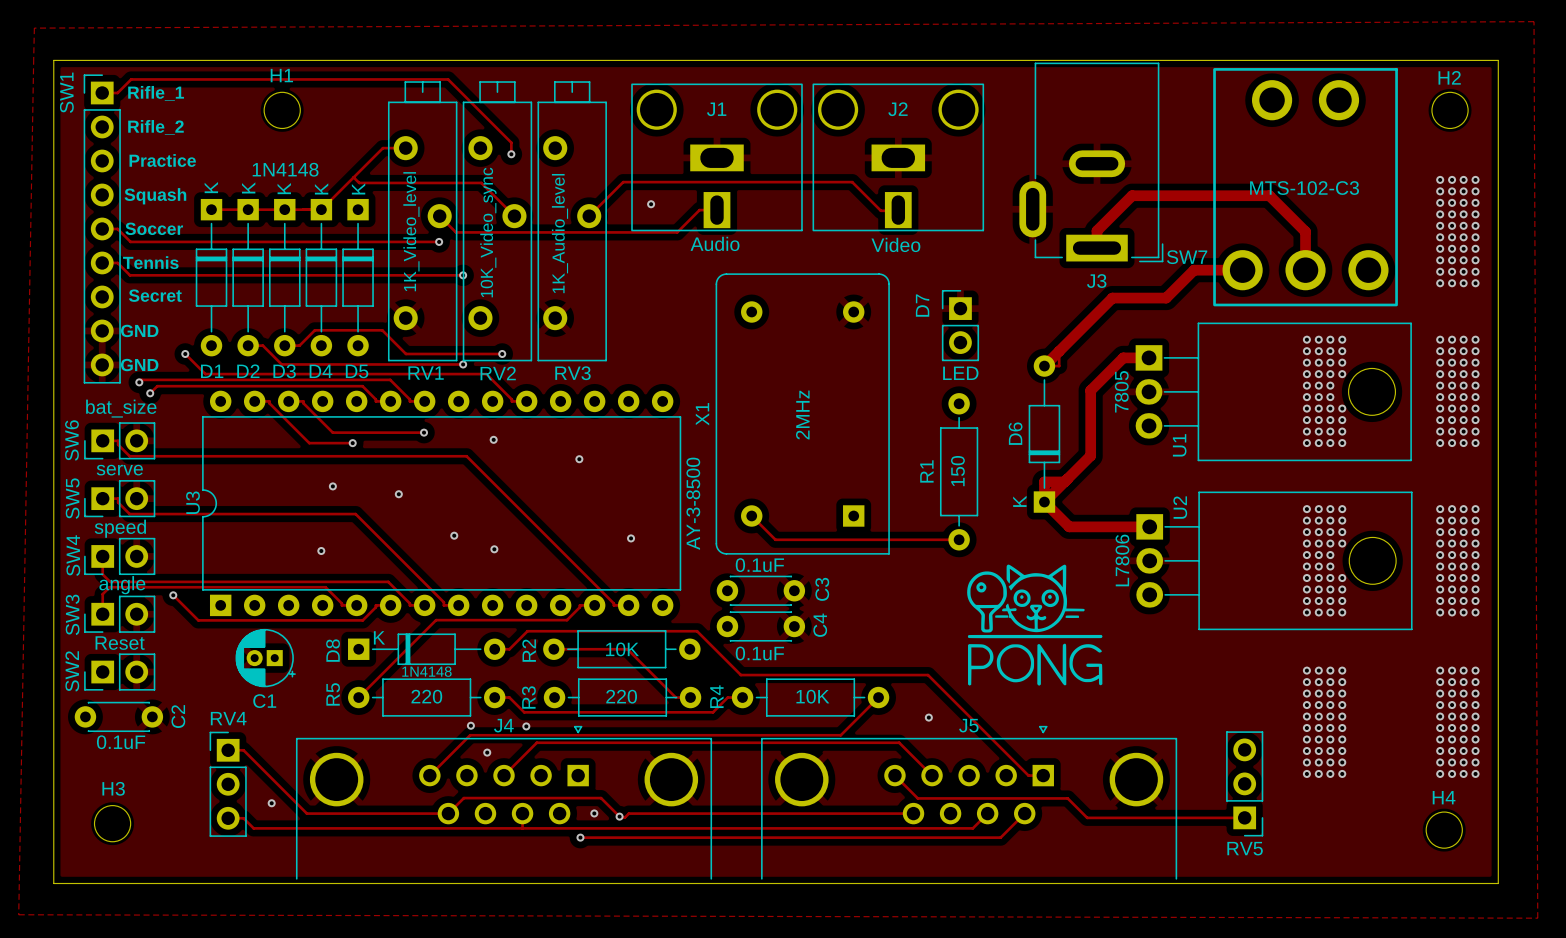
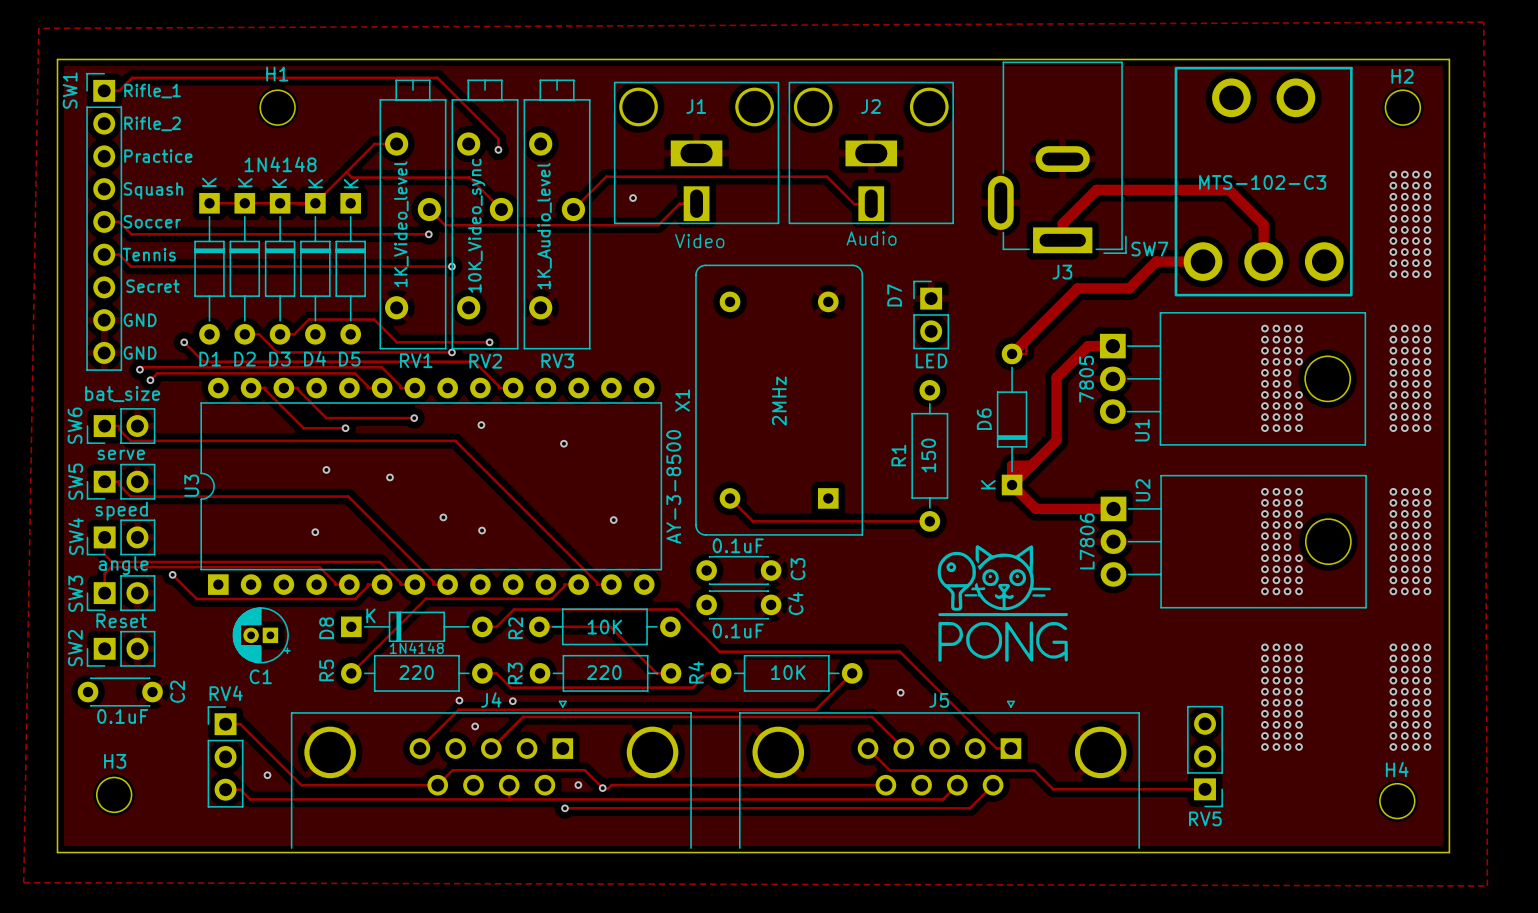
text: Audio (715, 243) -> Video (699, 241)
text: Video (895, 244) -> Audio (871, 238)

